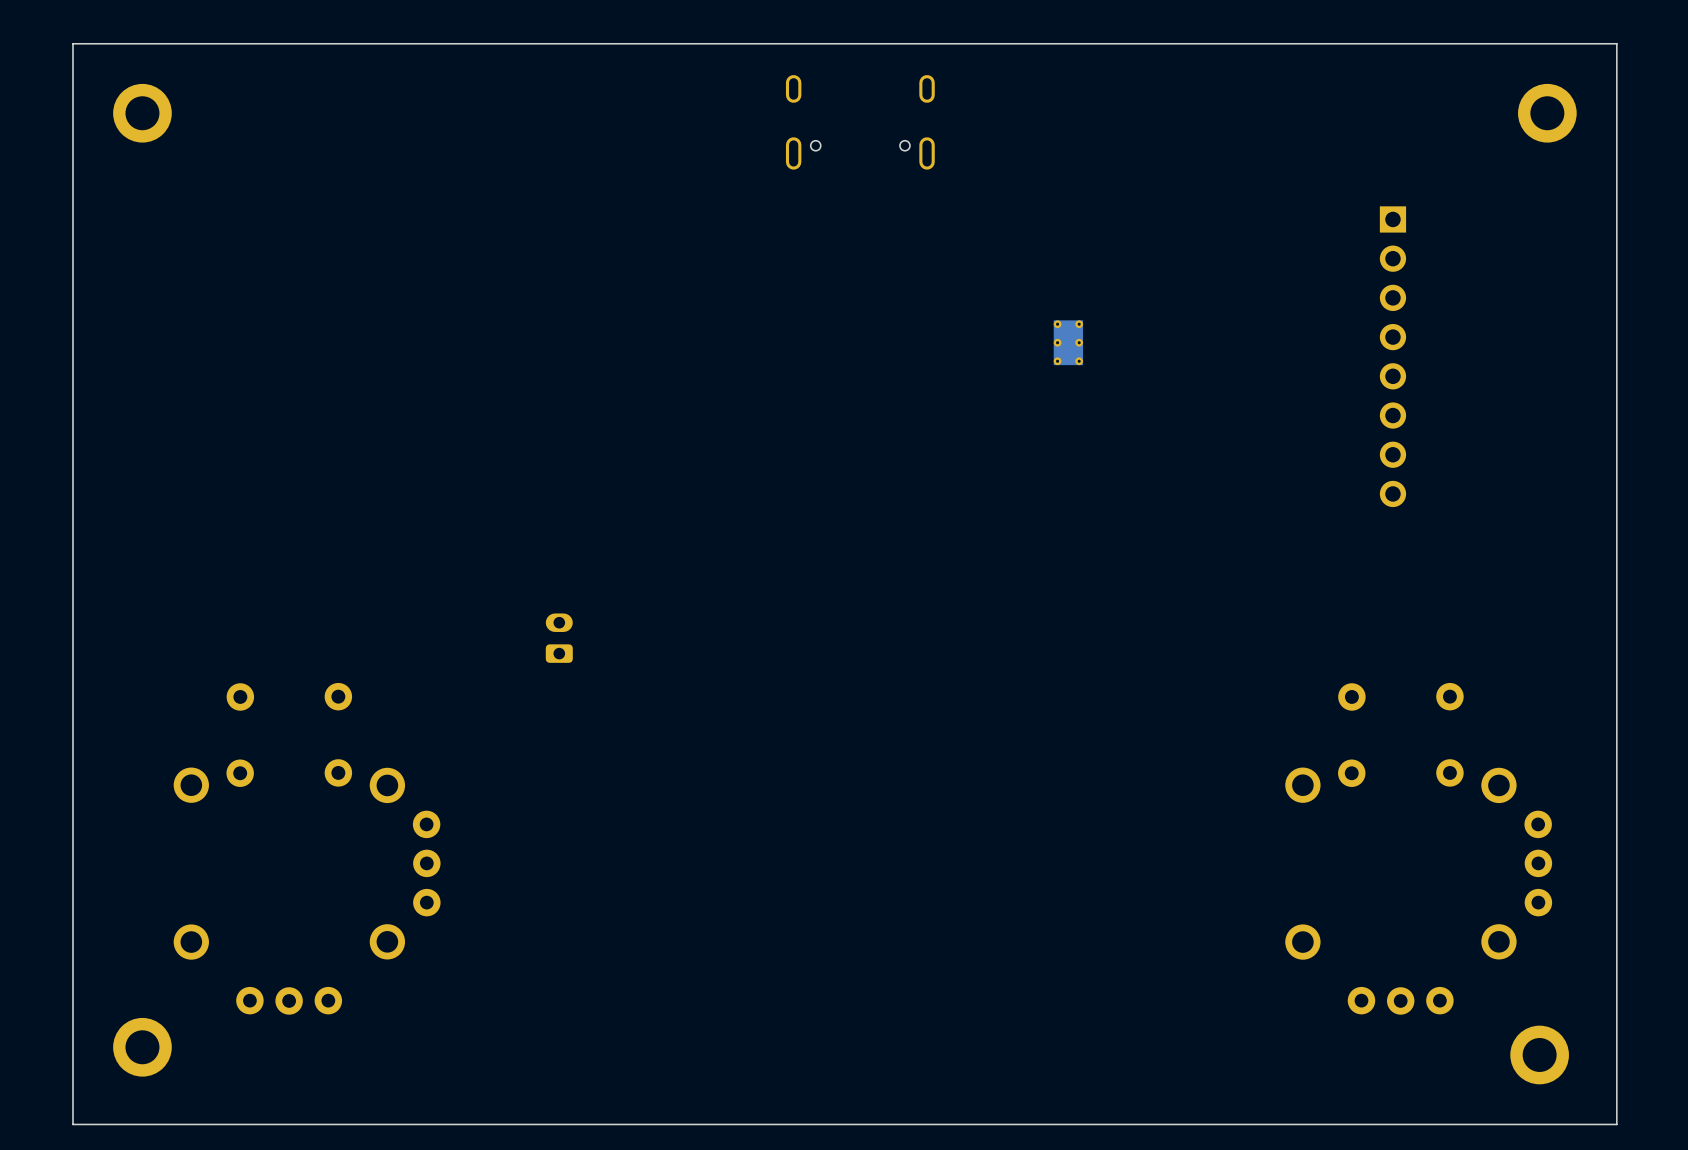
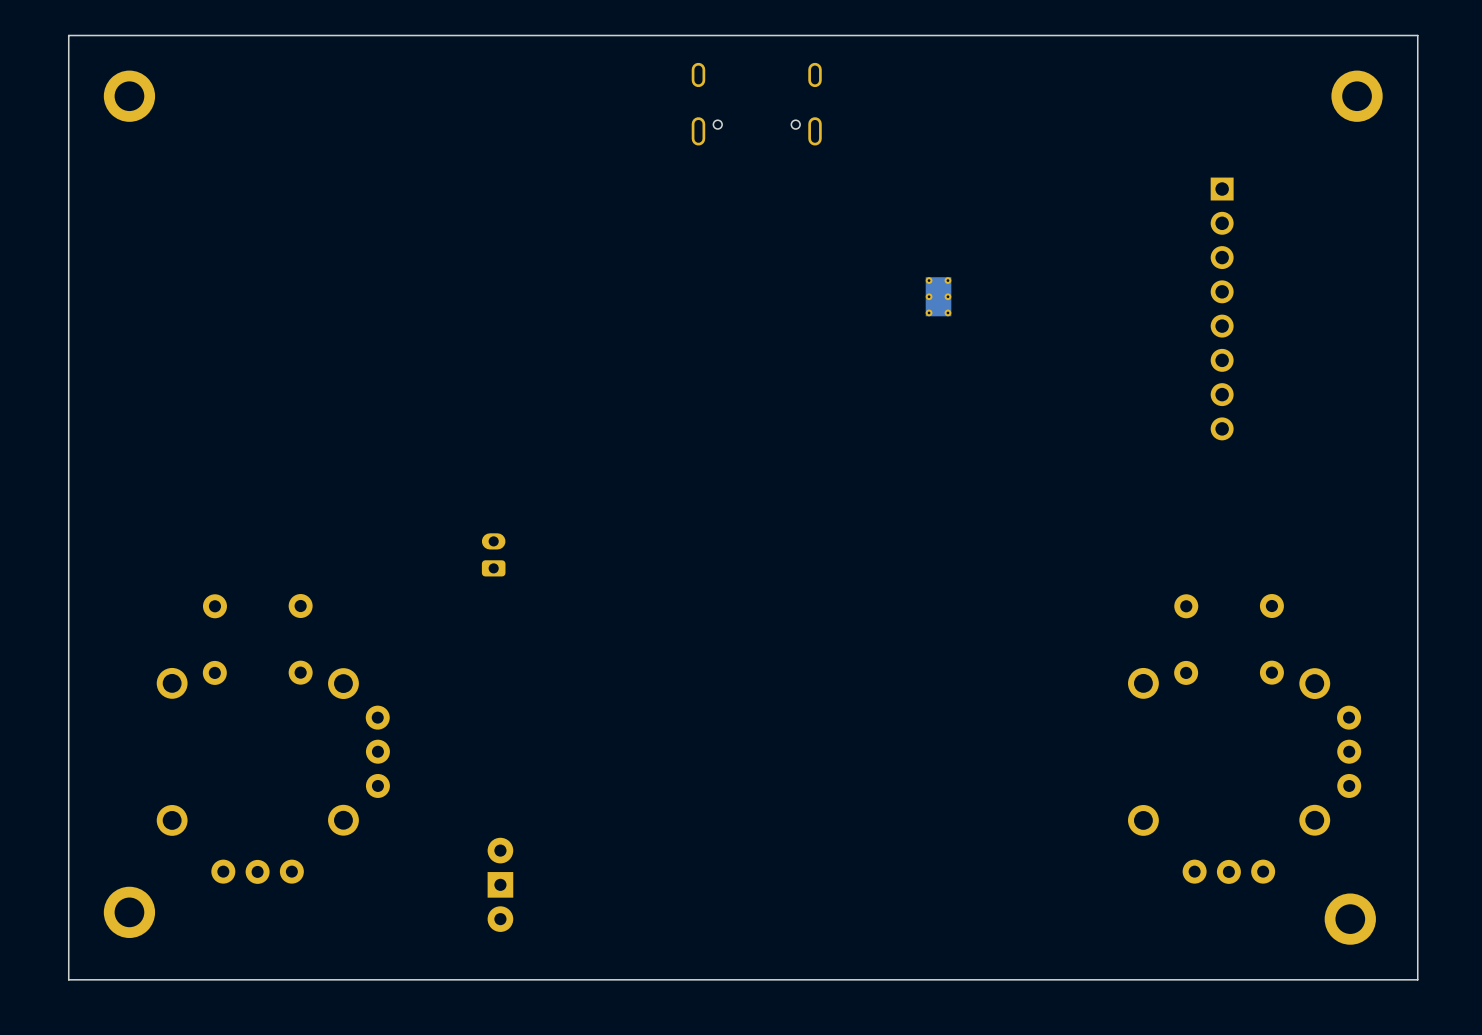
part: none -> (500, 884)

